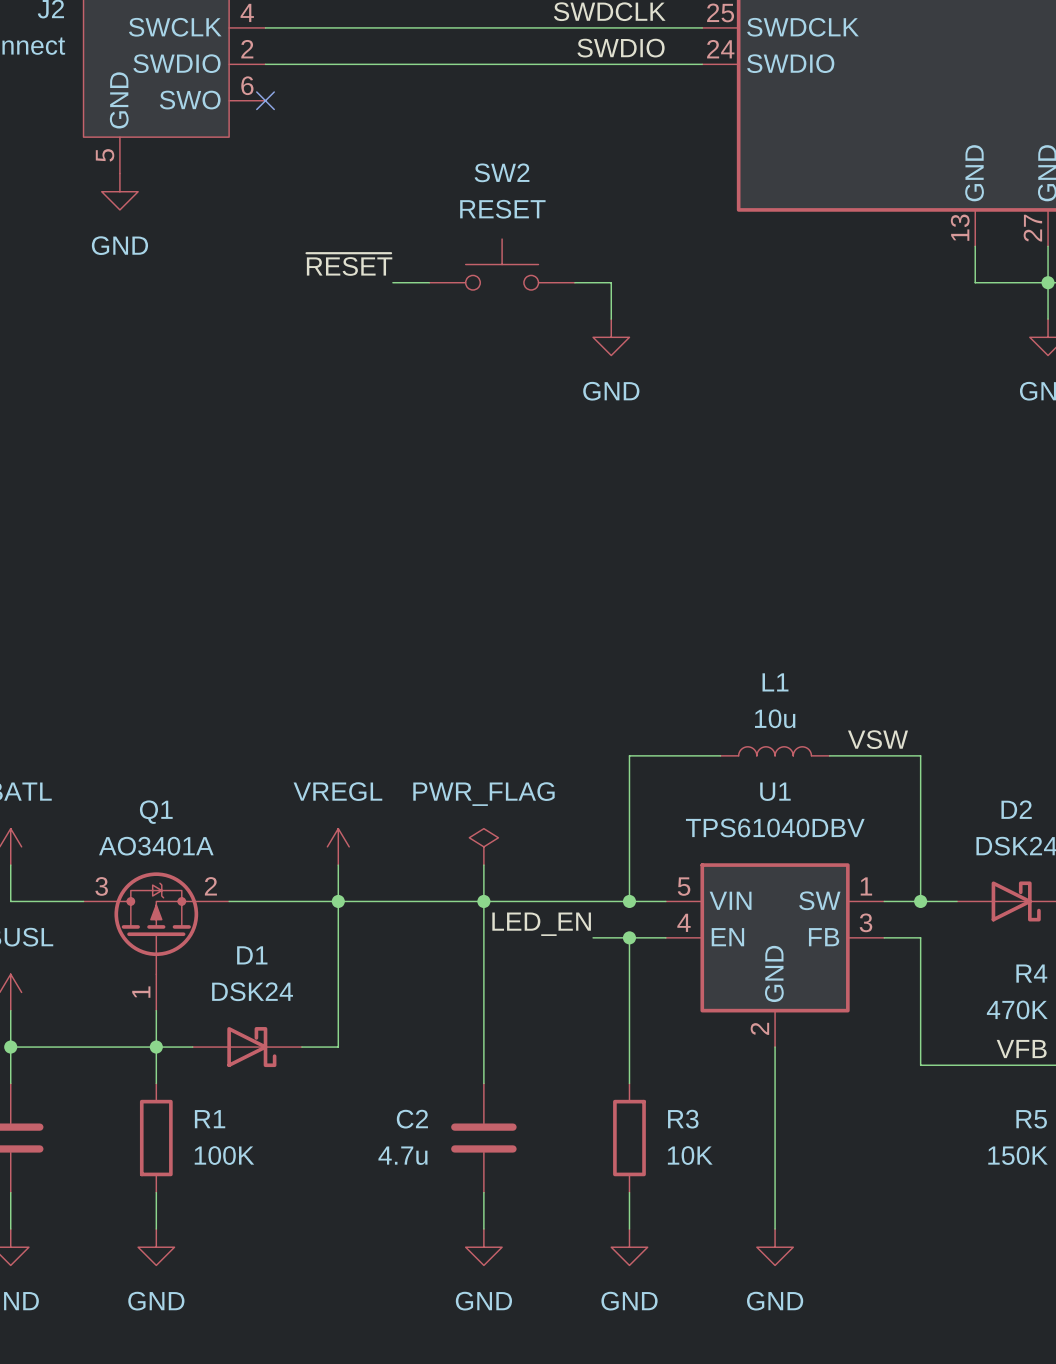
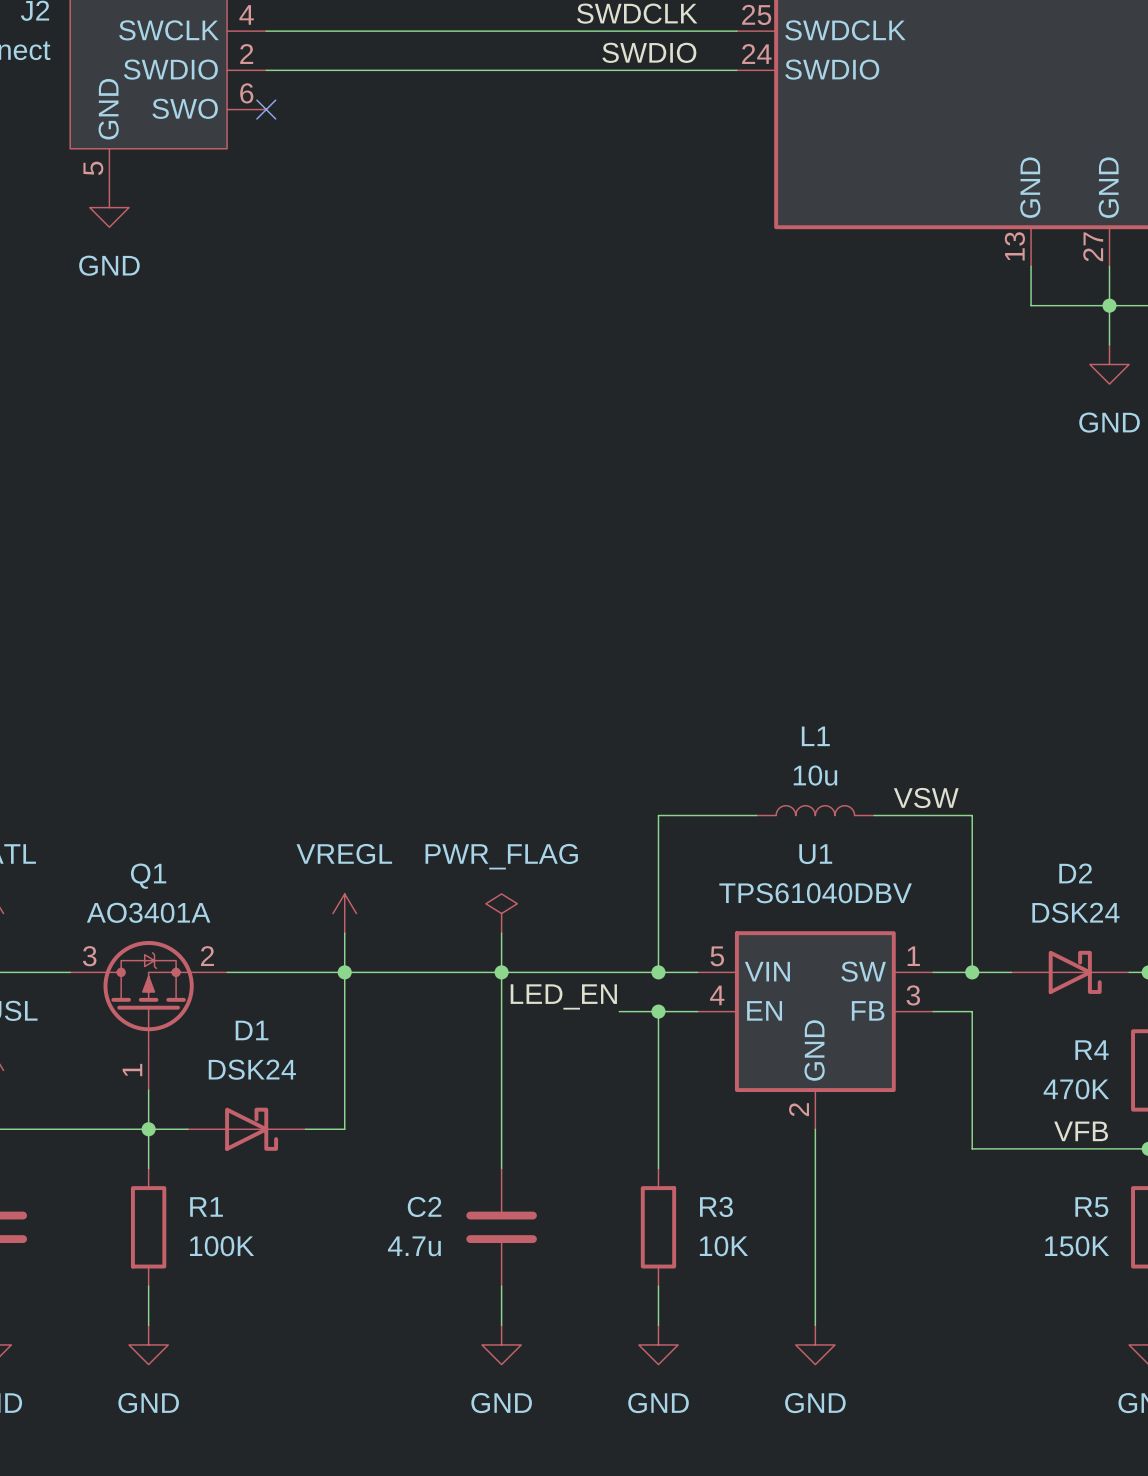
label: ~{RESET} (349, 264) -> none
SW2: RESET (502, 264) -> none
wire: (392, 282) (429, 282) -> none
wire: (574, 282) (611, 282) (611, 319) -> none
power symbol: GND (611, 337) -> none

